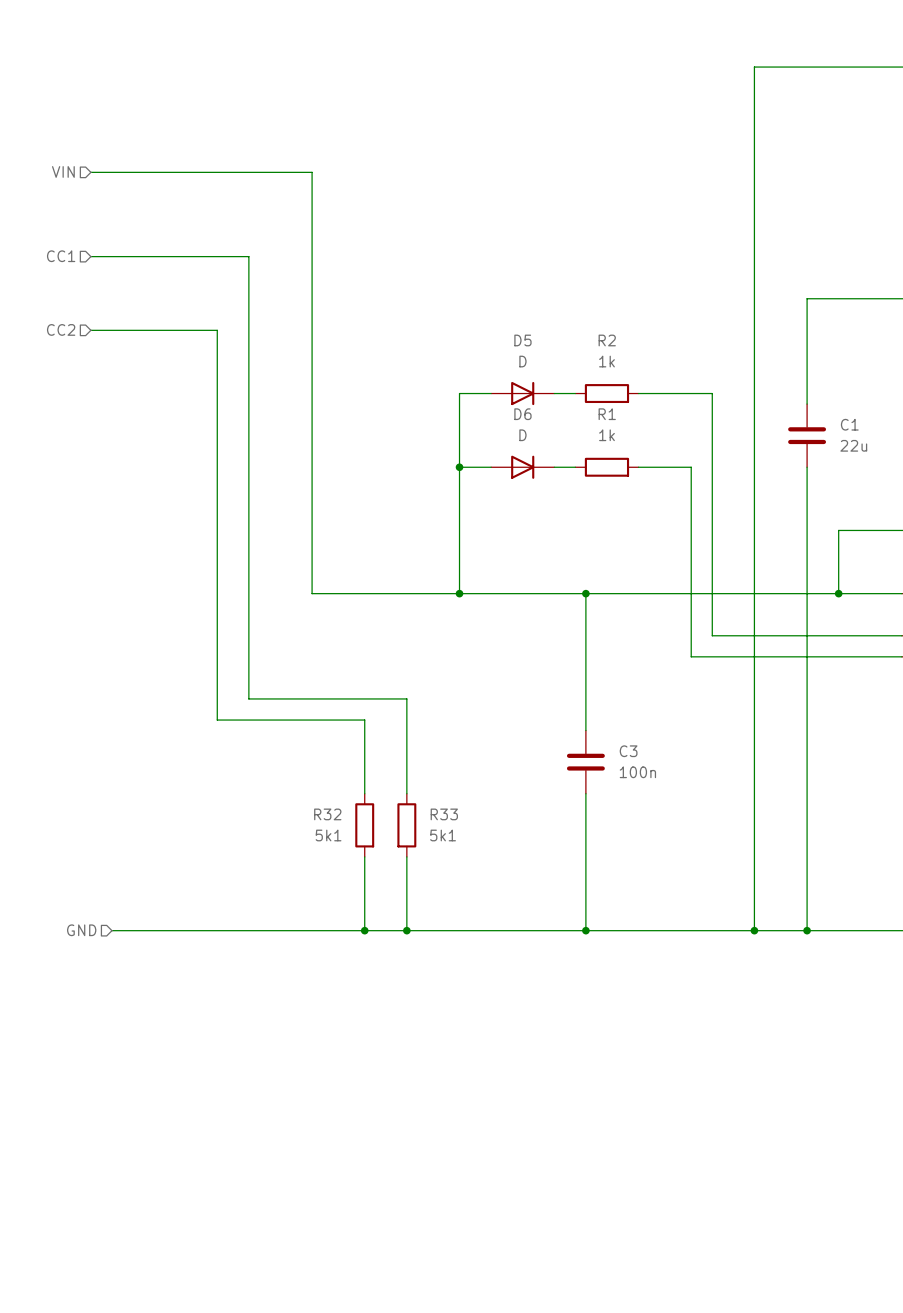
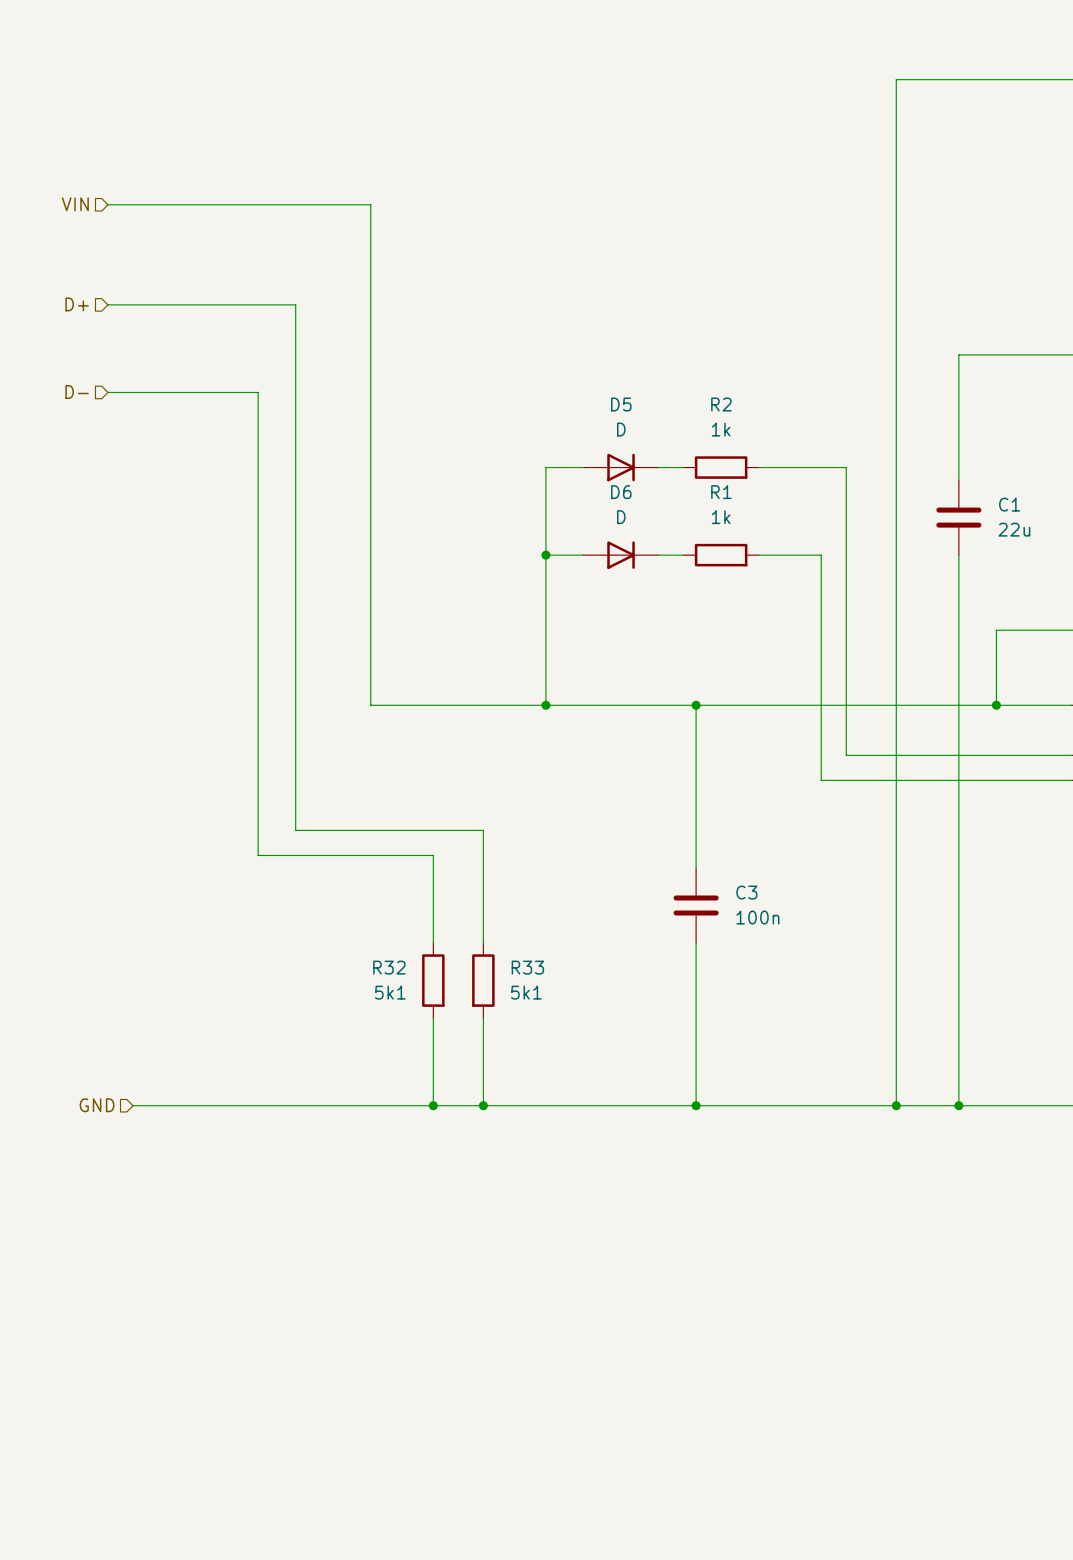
hierarchical label: CC1 (61, 256) -> D+ (77, 304)
hierarchical label: CC2 (61, 329) -> D- (77, 392)

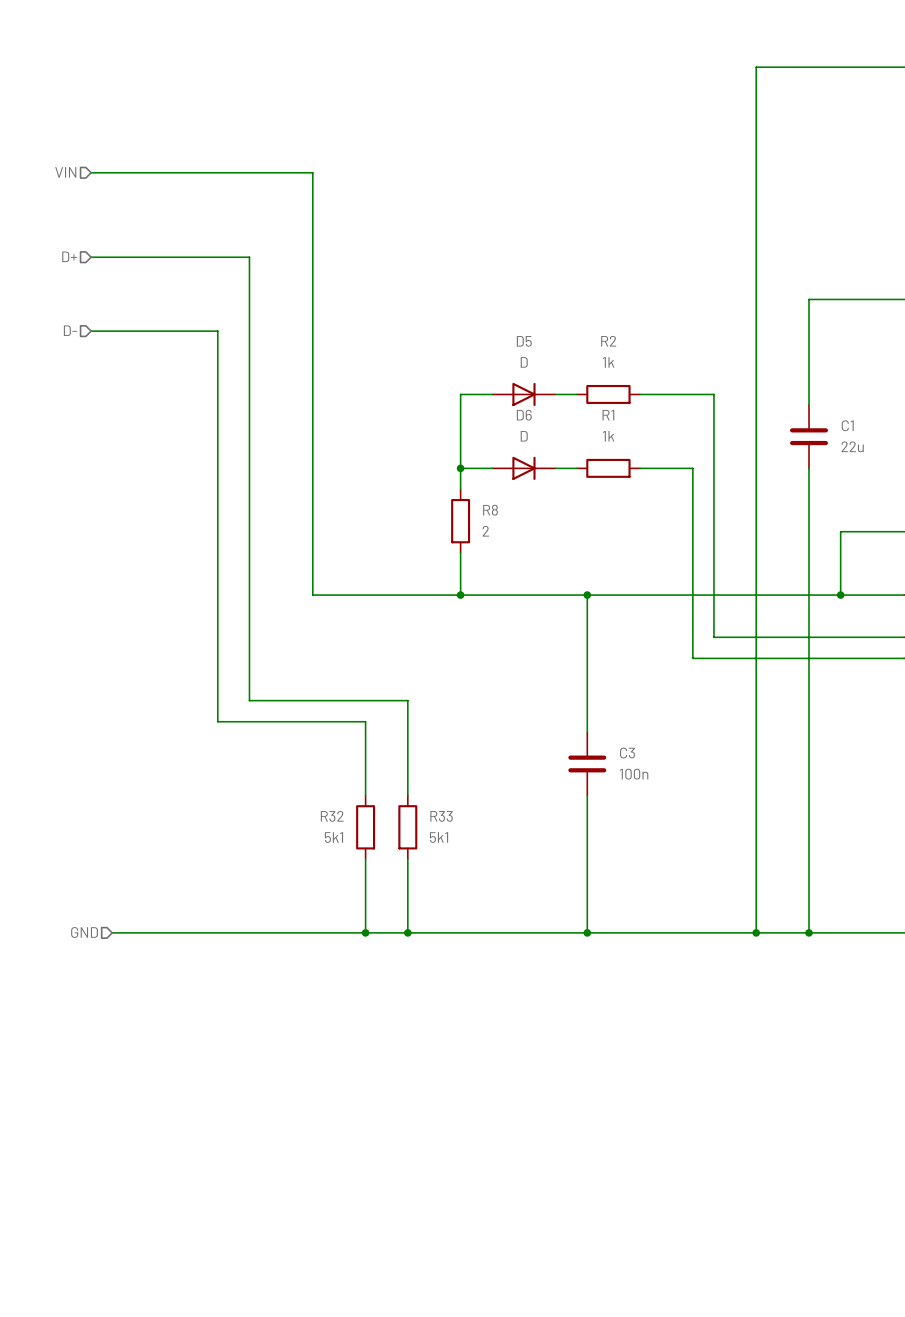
wire: (545, 580) (545, 655) -> none
R8: none -> 2 (460, 521)

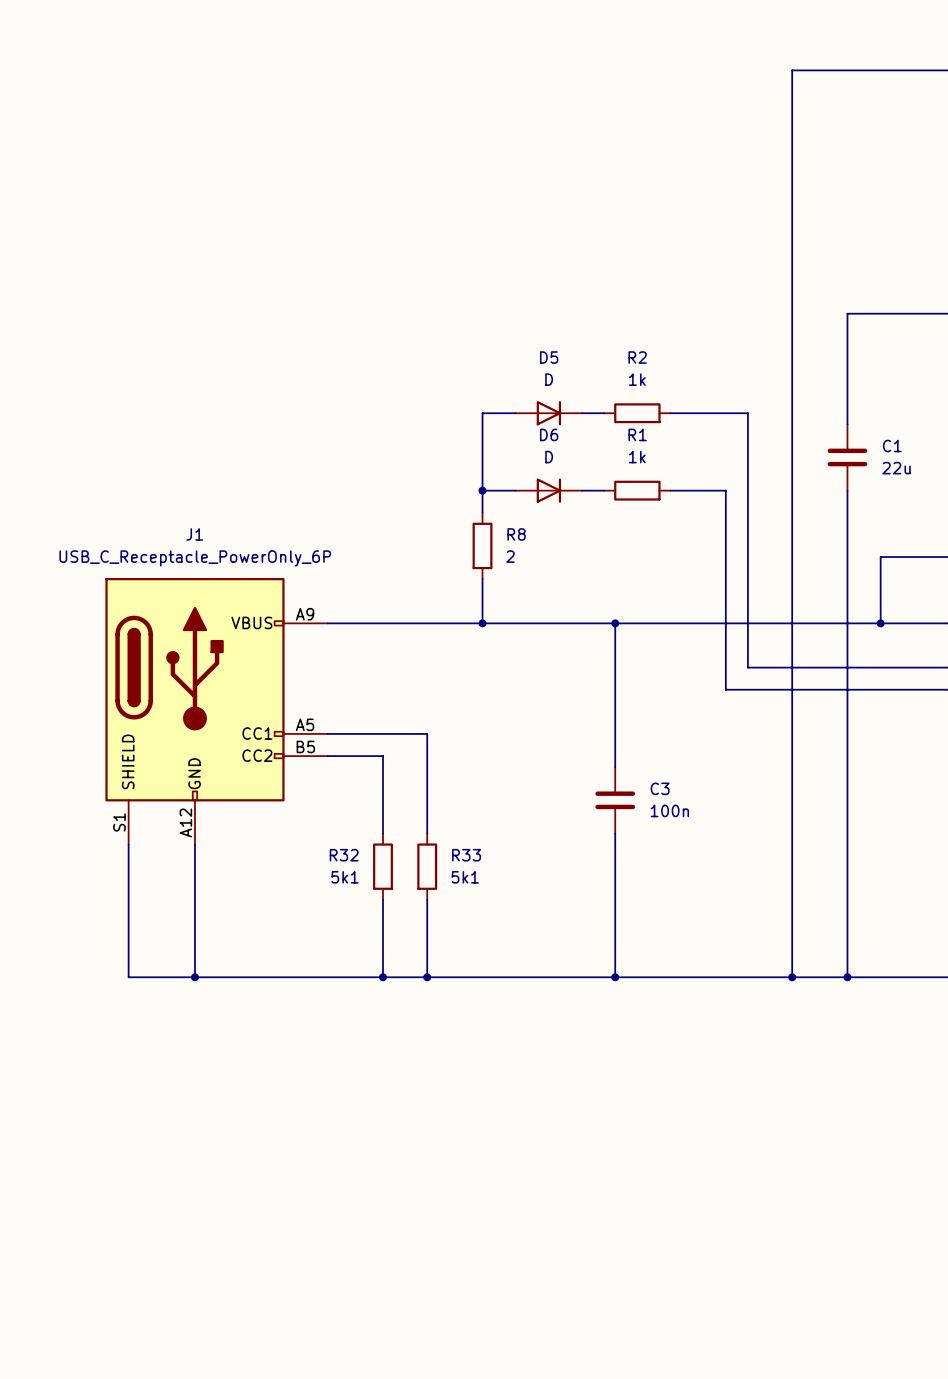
hierarchical label: VIN (65, 172) -> none
wire: (91, 172) (312, 172) (312, 595) -> none
hierarchical label: D+ (69, 256) -> none
wire: (91, 257) (249, 257) (249, 700) (312, 700) -> none
hierarchical label: D- (70, 330) -> none
wire: (91, 331) (217, 331) (217, 721) (312, 721) -> none
J1: none -> USB_C_Receptacle_PowerOnly_6P (216, 711)
wire: none -> (194, 844) (194, 977)
hierarchical label: GND (84, 932) -> none
wire: (112, 932) (122, 932) -> (128, 844) (128, 977)
junction: none -> (194, 977)

